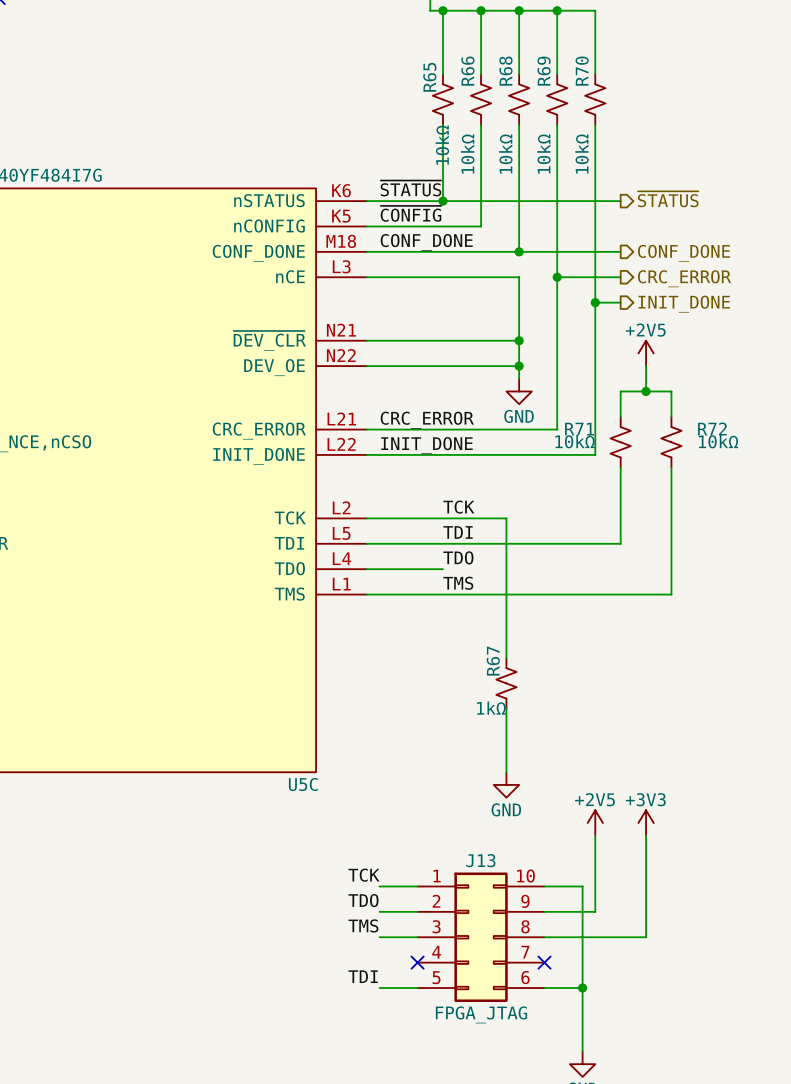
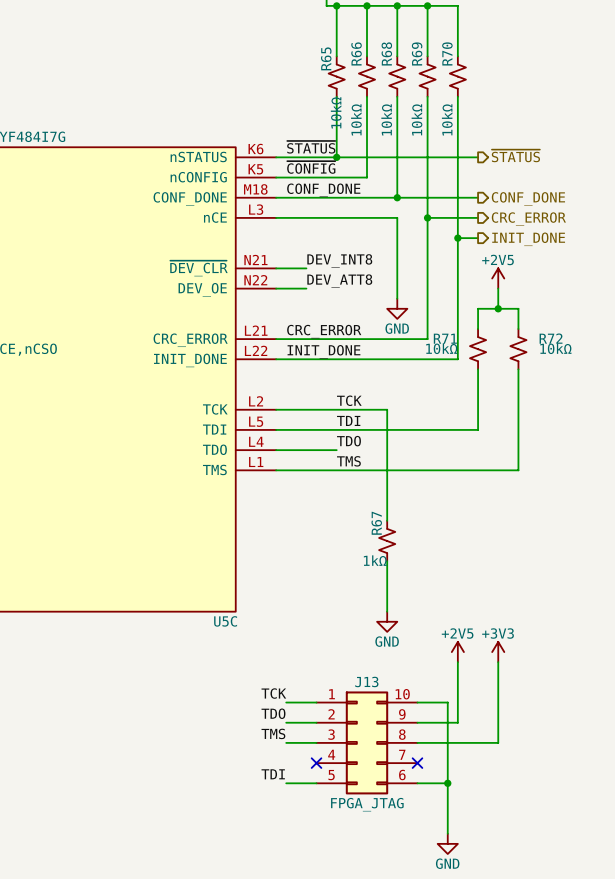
label: none -> DEV_INT8 (339, 260)
wire: (404, 340) (519, 340) -> none
junction: (519, 340) -> none
label: none -> DEV_ATT8 (339, 281)
wire: (404, 366) (519, 366) -> none
junction: (519, 366) -> none

